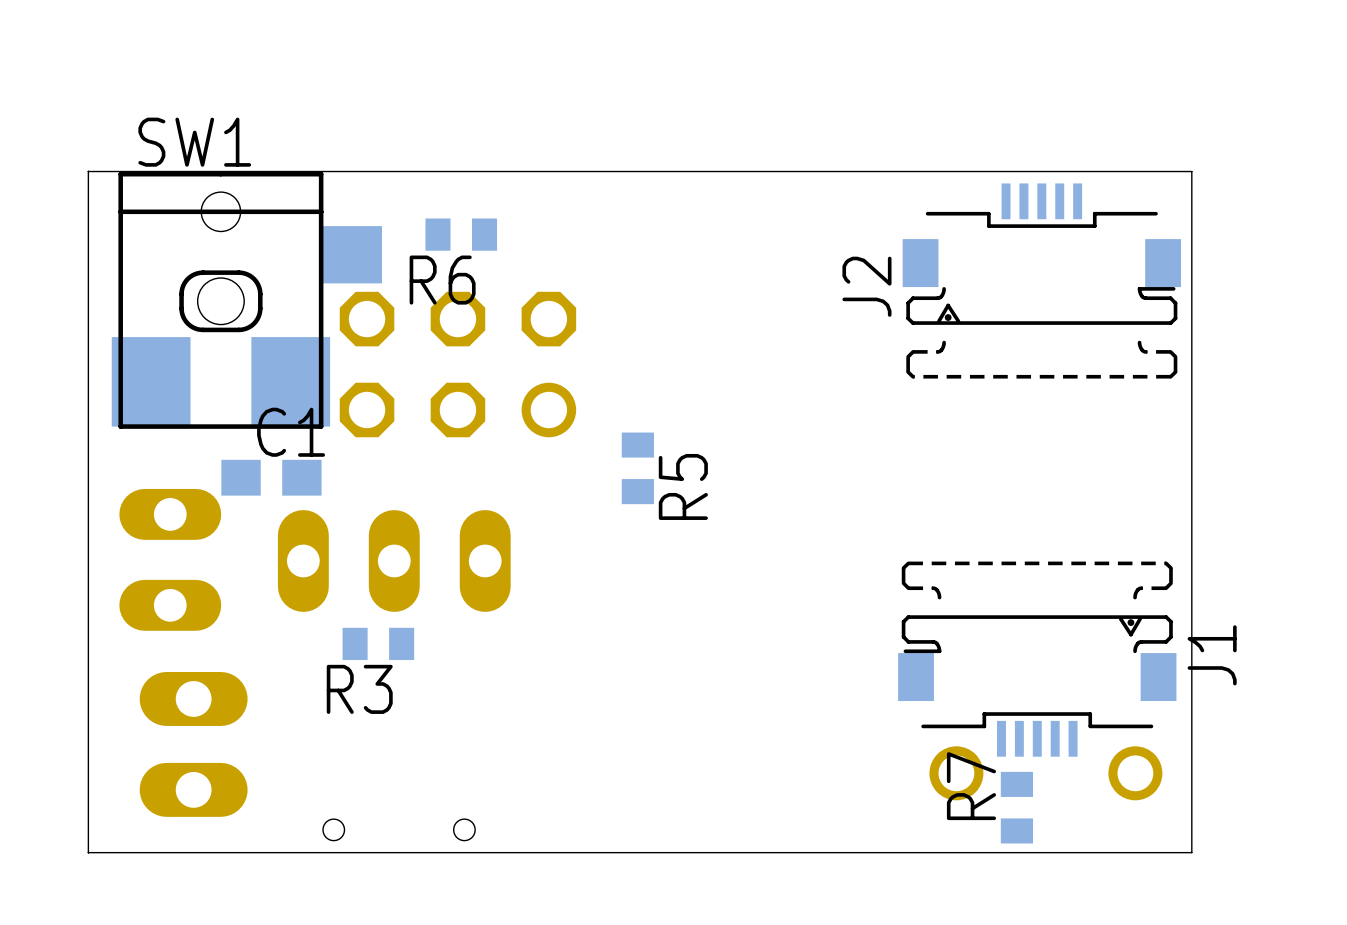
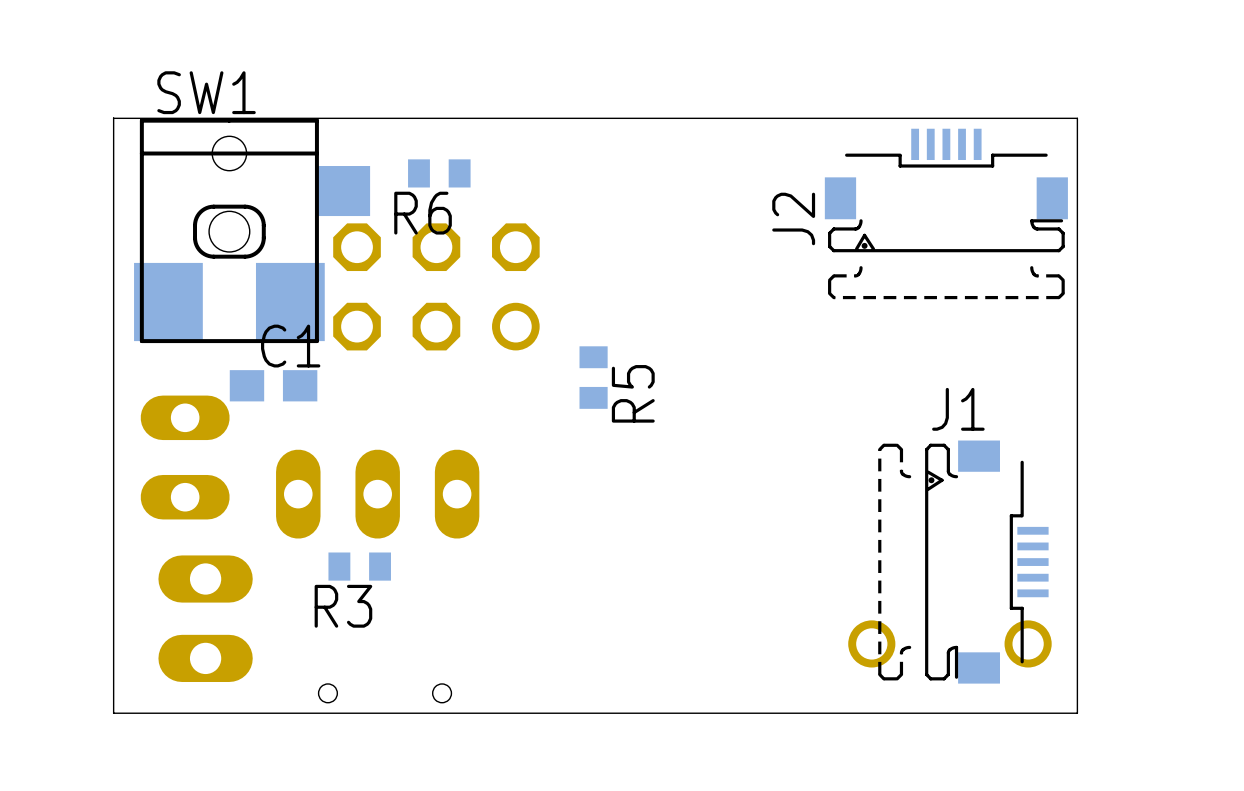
part position: (394, 560) -> (377, 494)
R3 position: (378, 643) -> (359, 566)
J1 rotation: 0° (1037, 659) -> 90° counterclockwise (963, 562)
R7: (1016, 807) -> none

